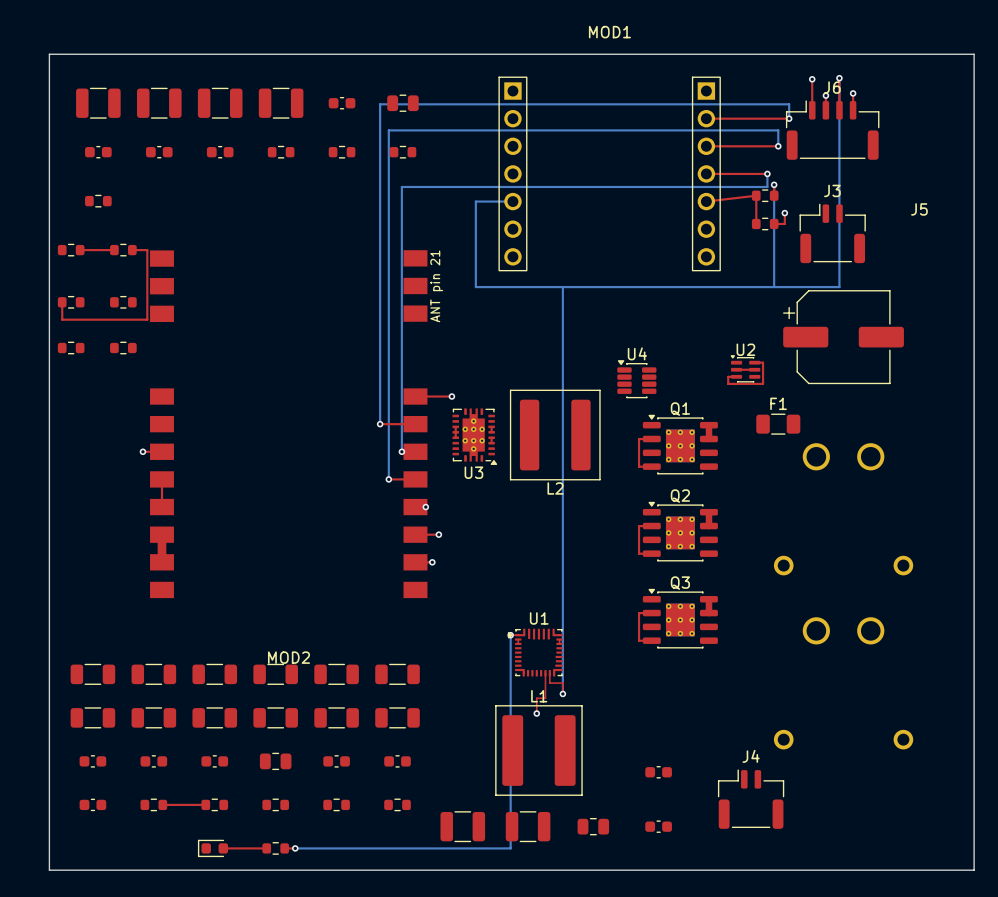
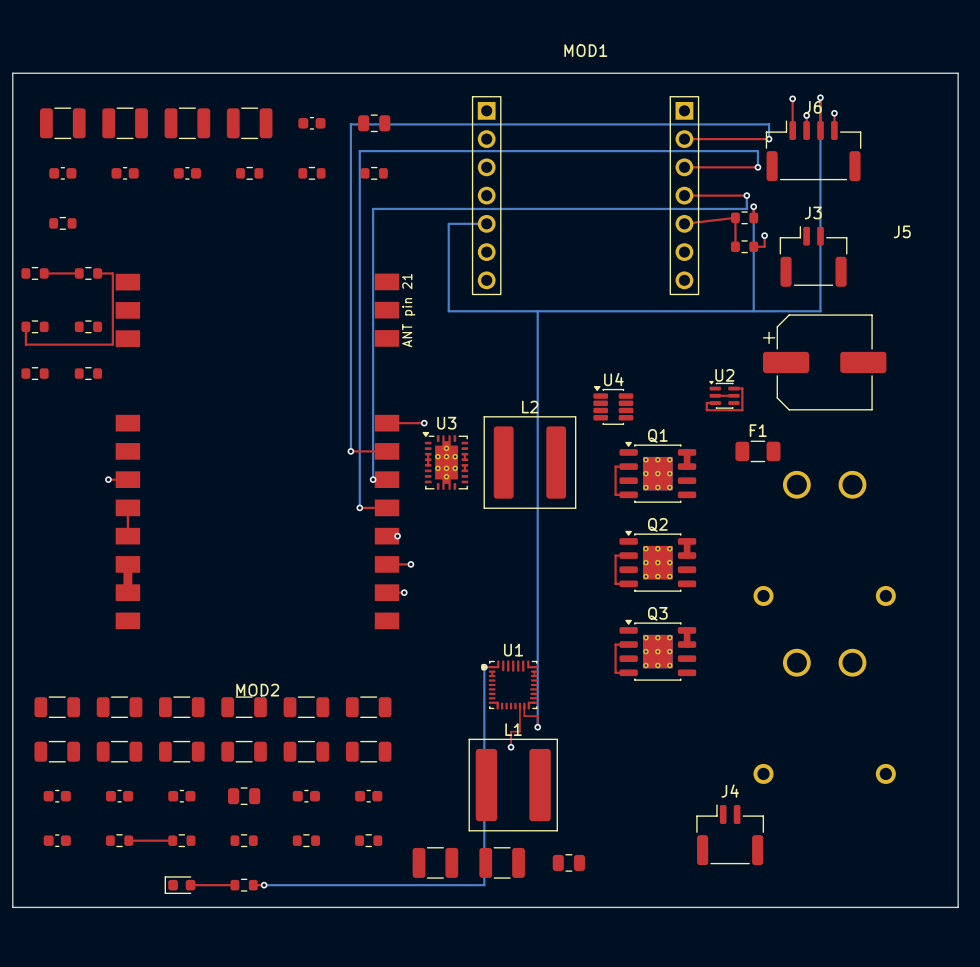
U3 rotation: 0° (474, 436) -> 180° (445, 460)
L2 name position: L2 (555, 488) -> L2 (530, 407)
part: (658, 772) -> none
part: (658, 826) -> none

